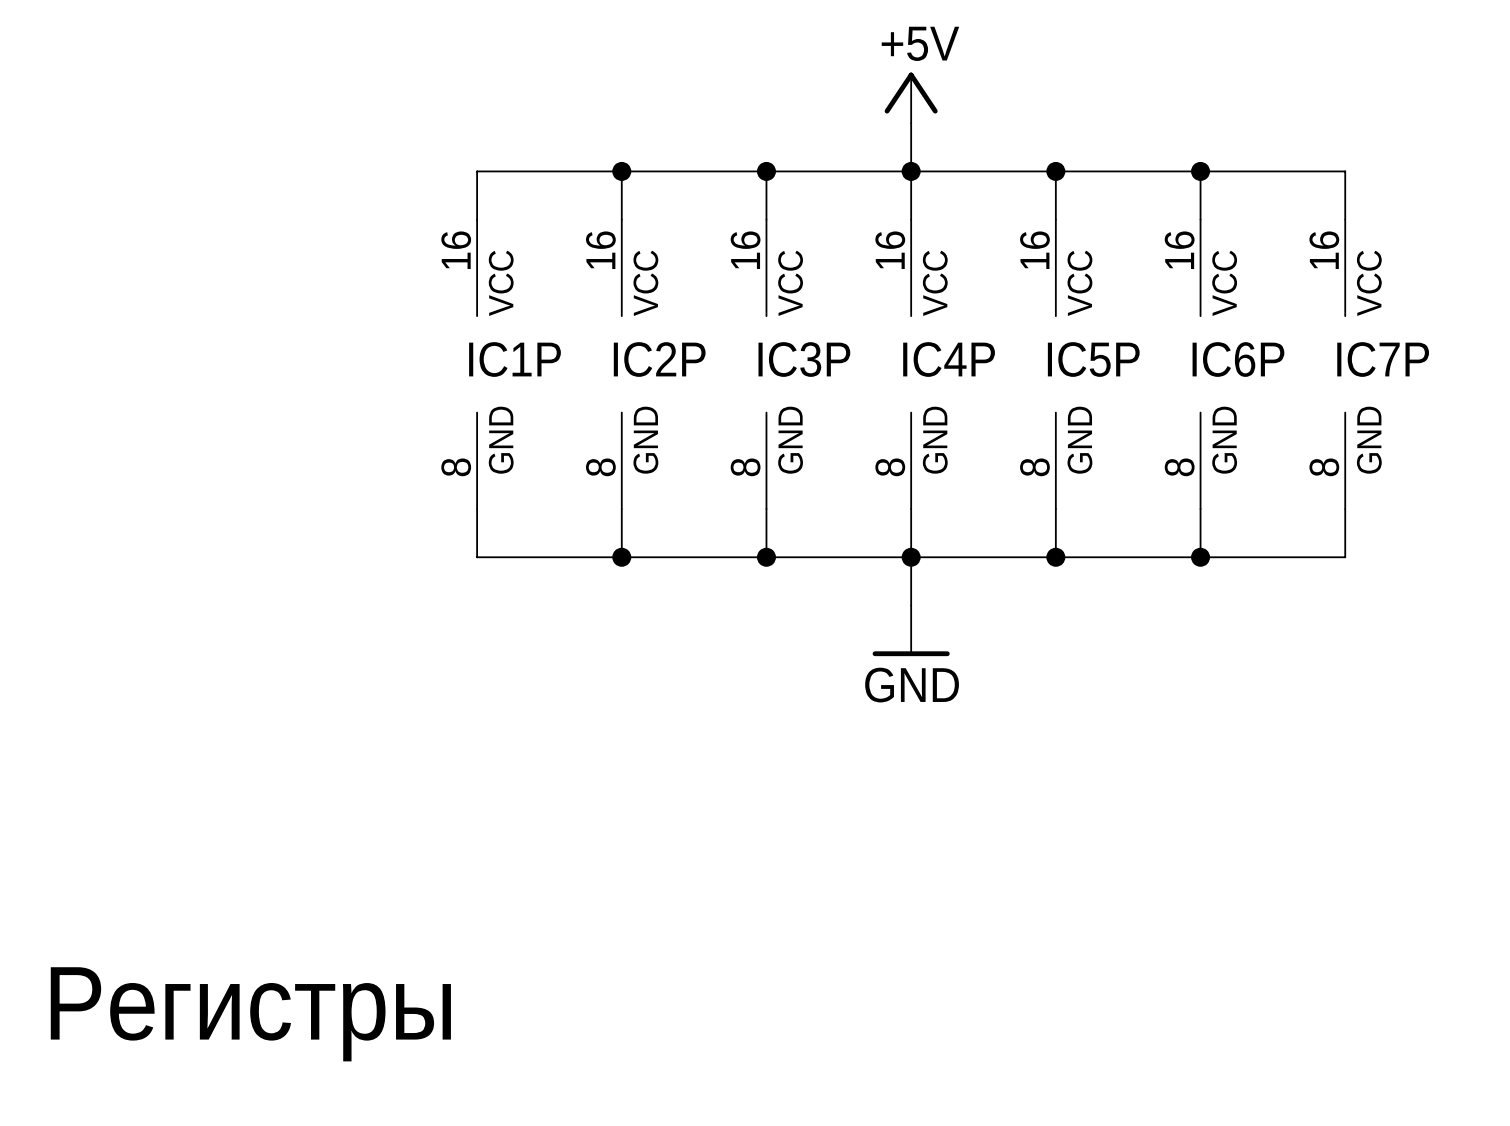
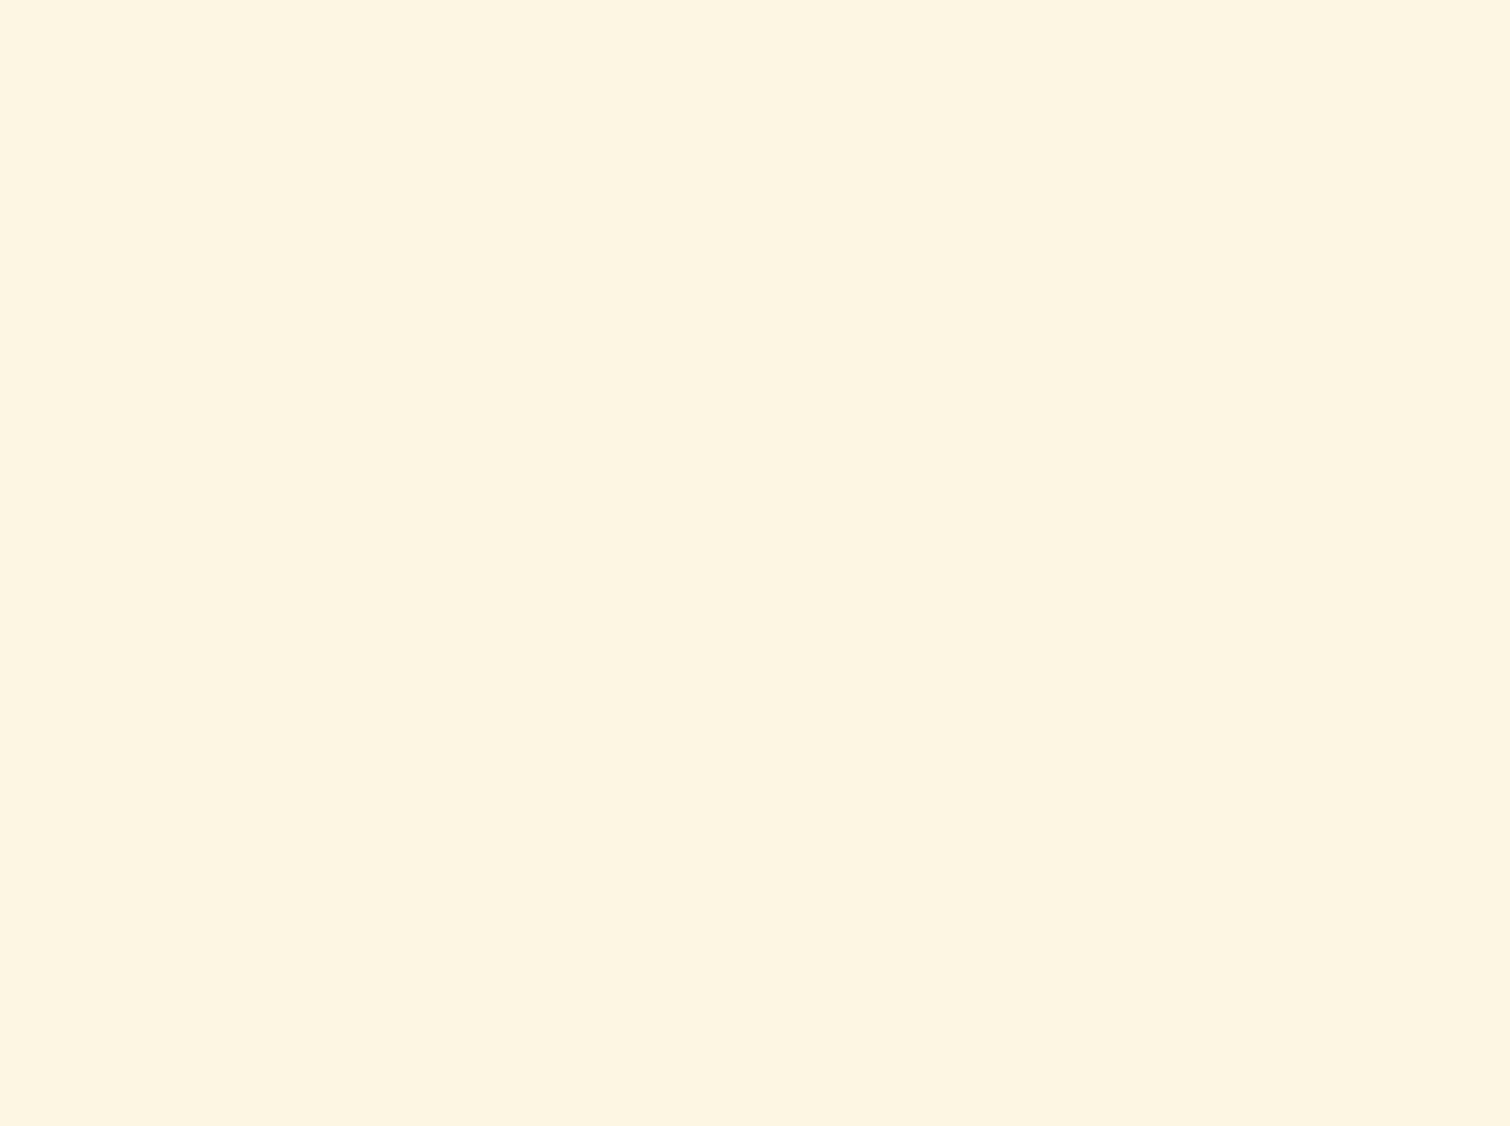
power symbol: +5V (911, 97) -> none
wire: (911, 123) (911, 219) -> none
wire: (621, 171) (621, 219) -> none
junction: (621, 171) -> none
wire: (766, 171) (766, 219) -> none
junction: (766, 171) -> none
junction: (911, 171) -> none
wire: (1055, 171) (1055, 219) -> none
junction: (1055, 171) -> none
wire: (1200, 171) (1200, 219) -> none
junction: (1200, 171) -> none
wire: (477, 219) (477, 171) (1345, 171) (1345, 219) -> none
IC1P: (477, 364) -> none
IC2P: (621, 364) -> none
IC3P: (766, 364) -> none
IC4P: (911, 364) -> none
IC5P: (1055, 364) -> none
IC6P: (1200, 364) -> none
IC7P: (1345, 364) -> none
wire: (477, 509) (477, 557) (1345, 557) (1345, 509) -> none
wire: (621, 509) (621, 557) -> none
wire: (766, 509) (766, 557) -> none
wire: (911, 509) (911, 605) -> none
wire: (1055, 509) (1055, 557) -> none
wire: (1200, 509) (1200, 557) -> none
junction: (621, 557) -> none
junction: (766, 557) -> none
junction: (911, 557) -> none
junction: (1055, 557) -> none
junction: (1200, 557) -> none
power symbol: GND (911, 630) -> none
text: Регистры (250, 1014) -> none

